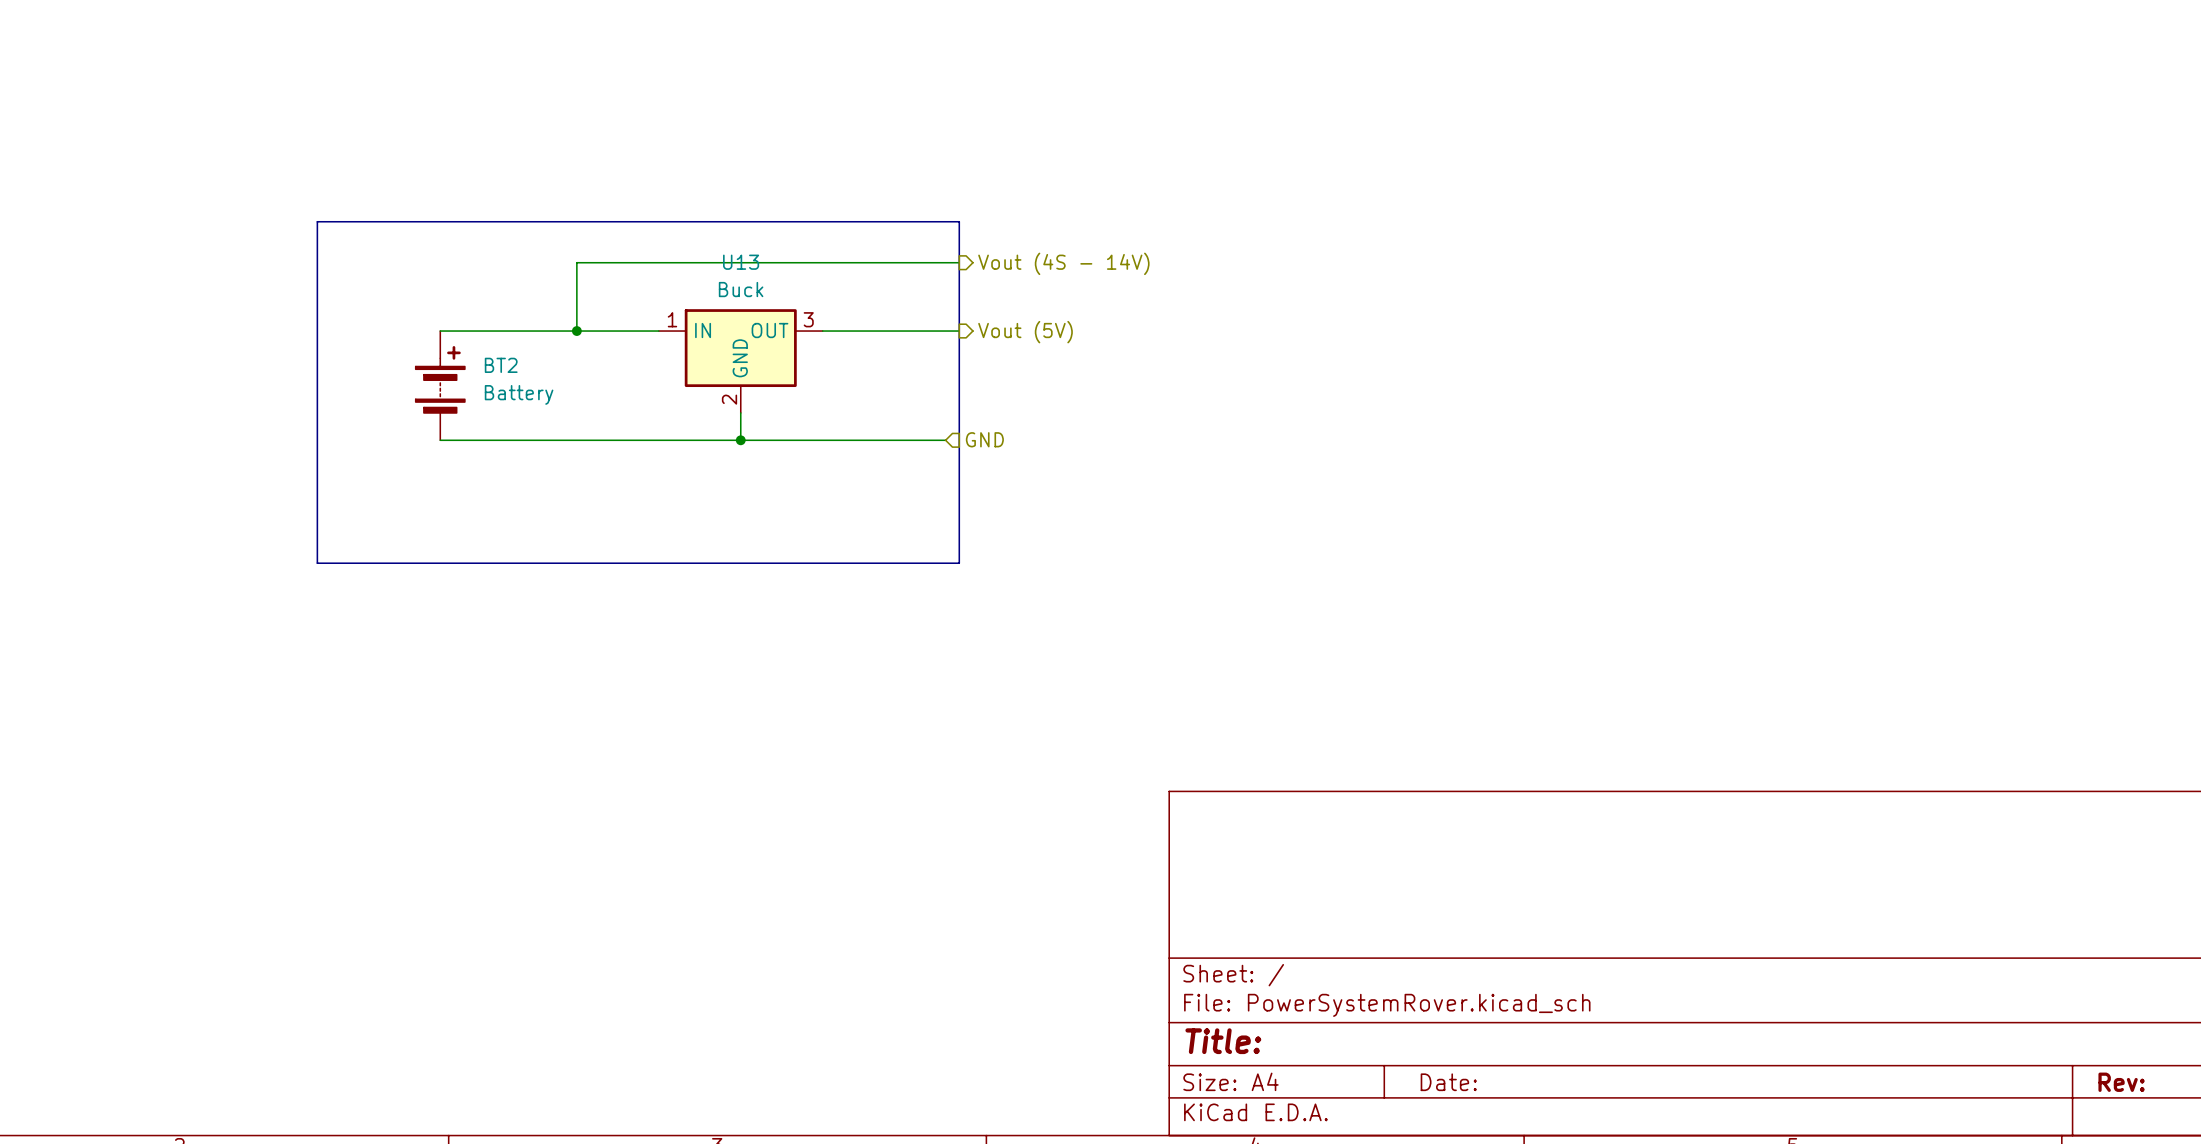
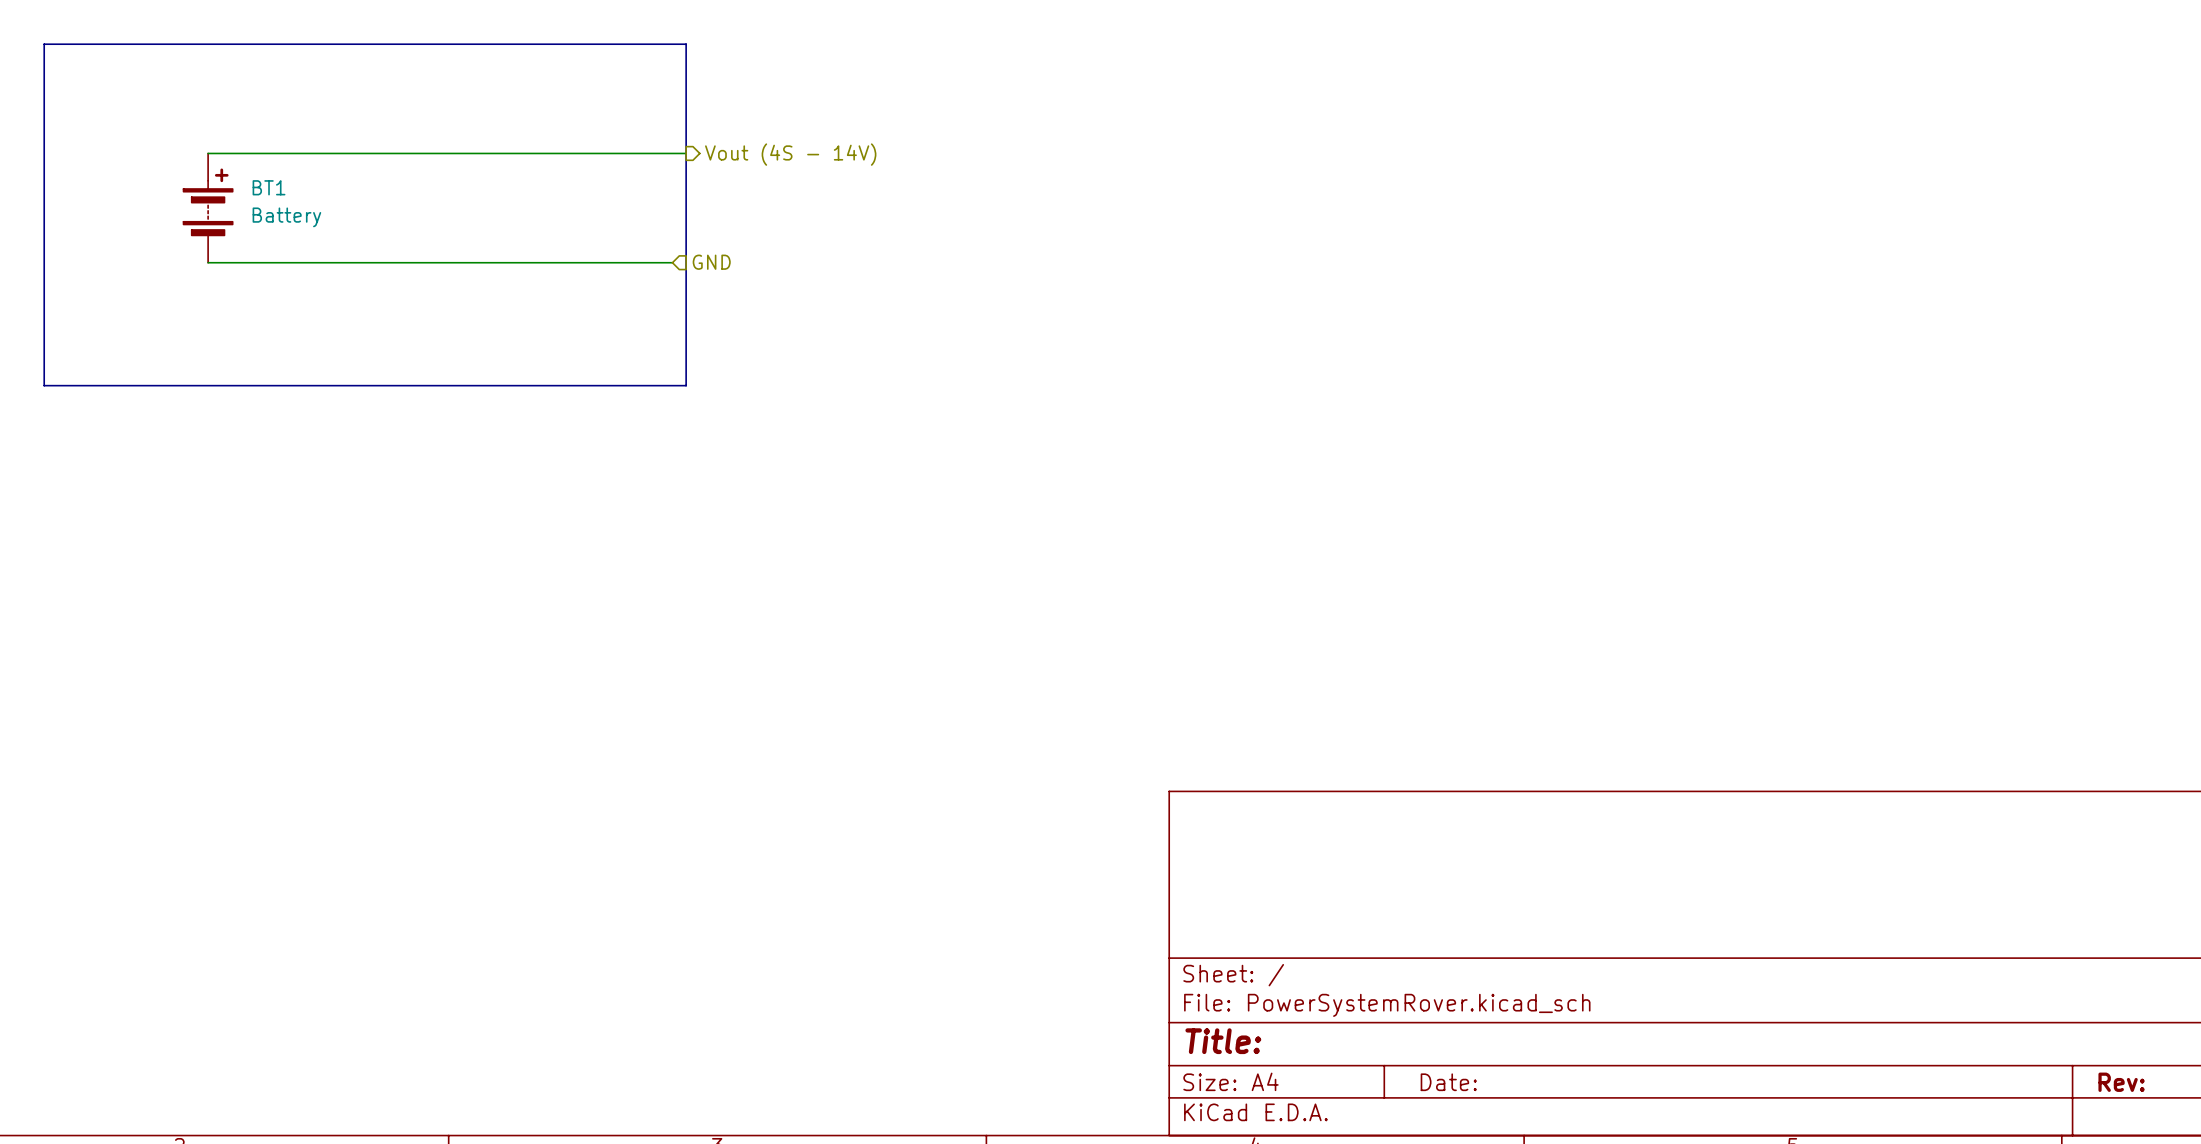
line: none -> (44, 44) (686, 44) (686, 385) (44, 385) (44, 44)
wire: none -> (208, 153) (686, 153)
hierarchical label: none -> Vout (4S - 14V) (790, 154)
BT1: none -> Battery (208, 208)
line: (317, 221) (959, 221) (959, 563) (317, 563) (317, 221) -> none
wire: (576, 262) (576, 331) -> (576, 262) (208, 262)
wire: (672, 262) (959, 262) -> none
hierarchical label: none -> GND (711, 262)
hierarchical label: Vout (4S - 14V) (1063, 263) -> none
wire: (440, 331) (658, 331) -> none
junction: (576, 331) -> none
wire: (822, 331) (959, 331) -> none
hierarchical label: Vout (5V) (1025, 332) -> none
U13: Buck (740, 361) -> none
BT2: Battery (440, 385) -> none
wire: (740, 412) (740, 440) -> none
hierarchical label: GND (984, 439) -> none
wire: (440, 440) (945, 440) -> none
junction: (740, 440) -> none

